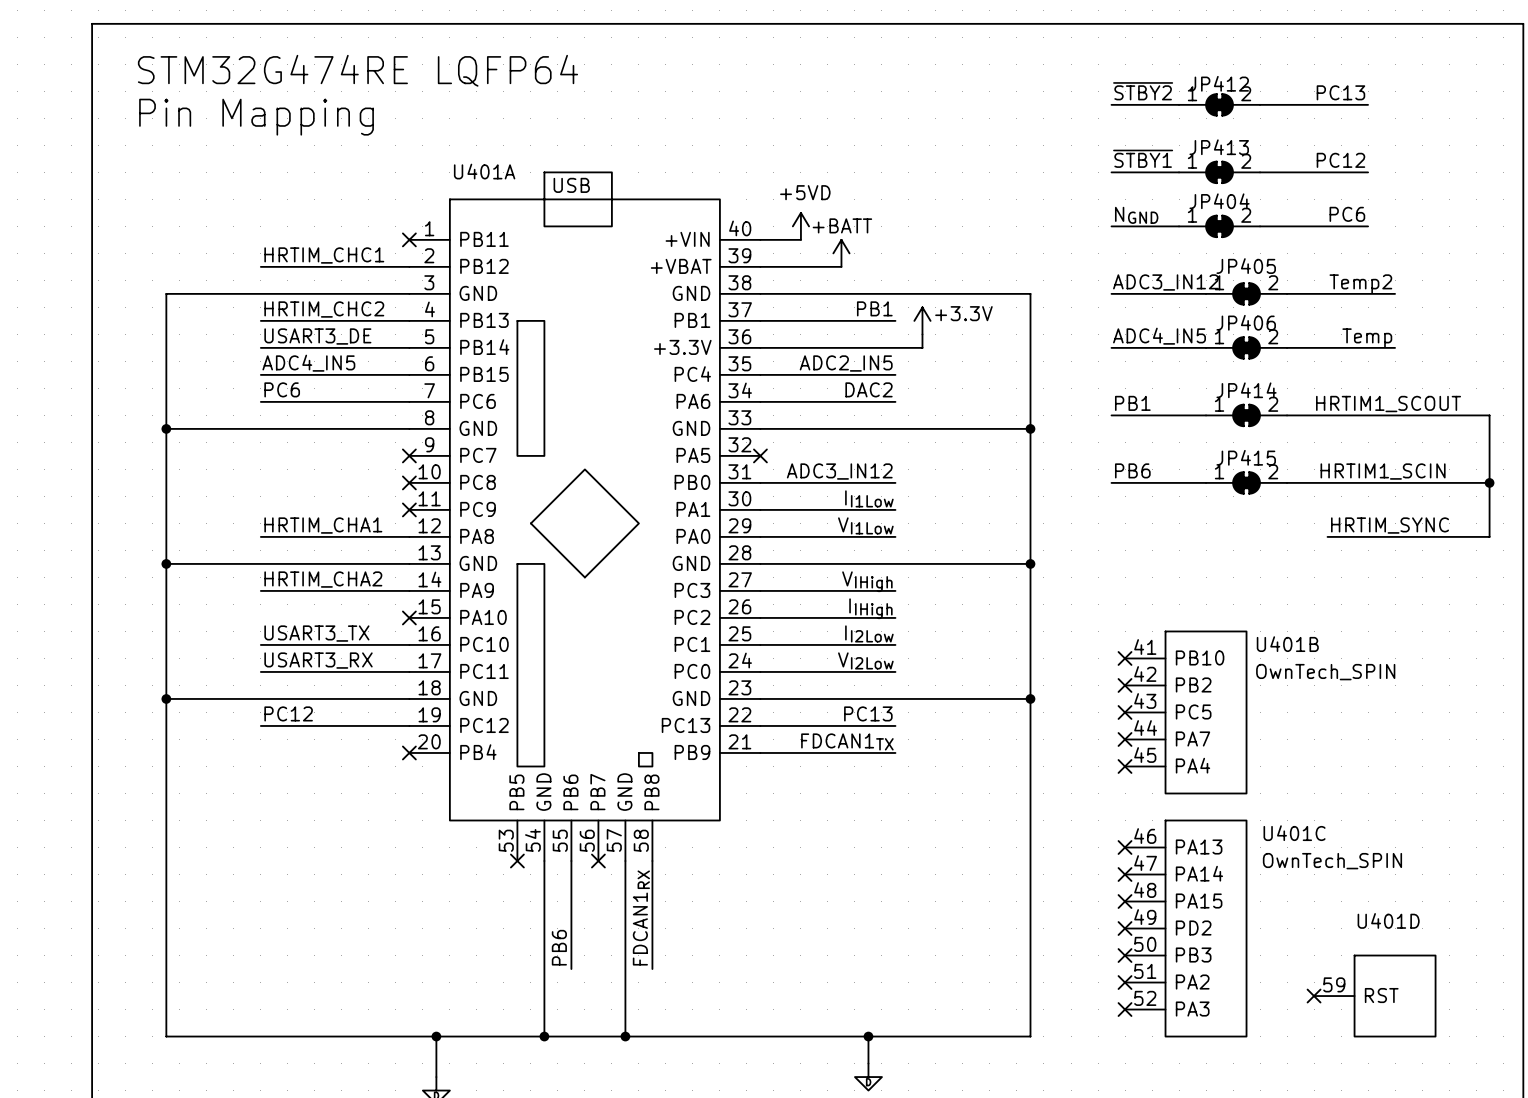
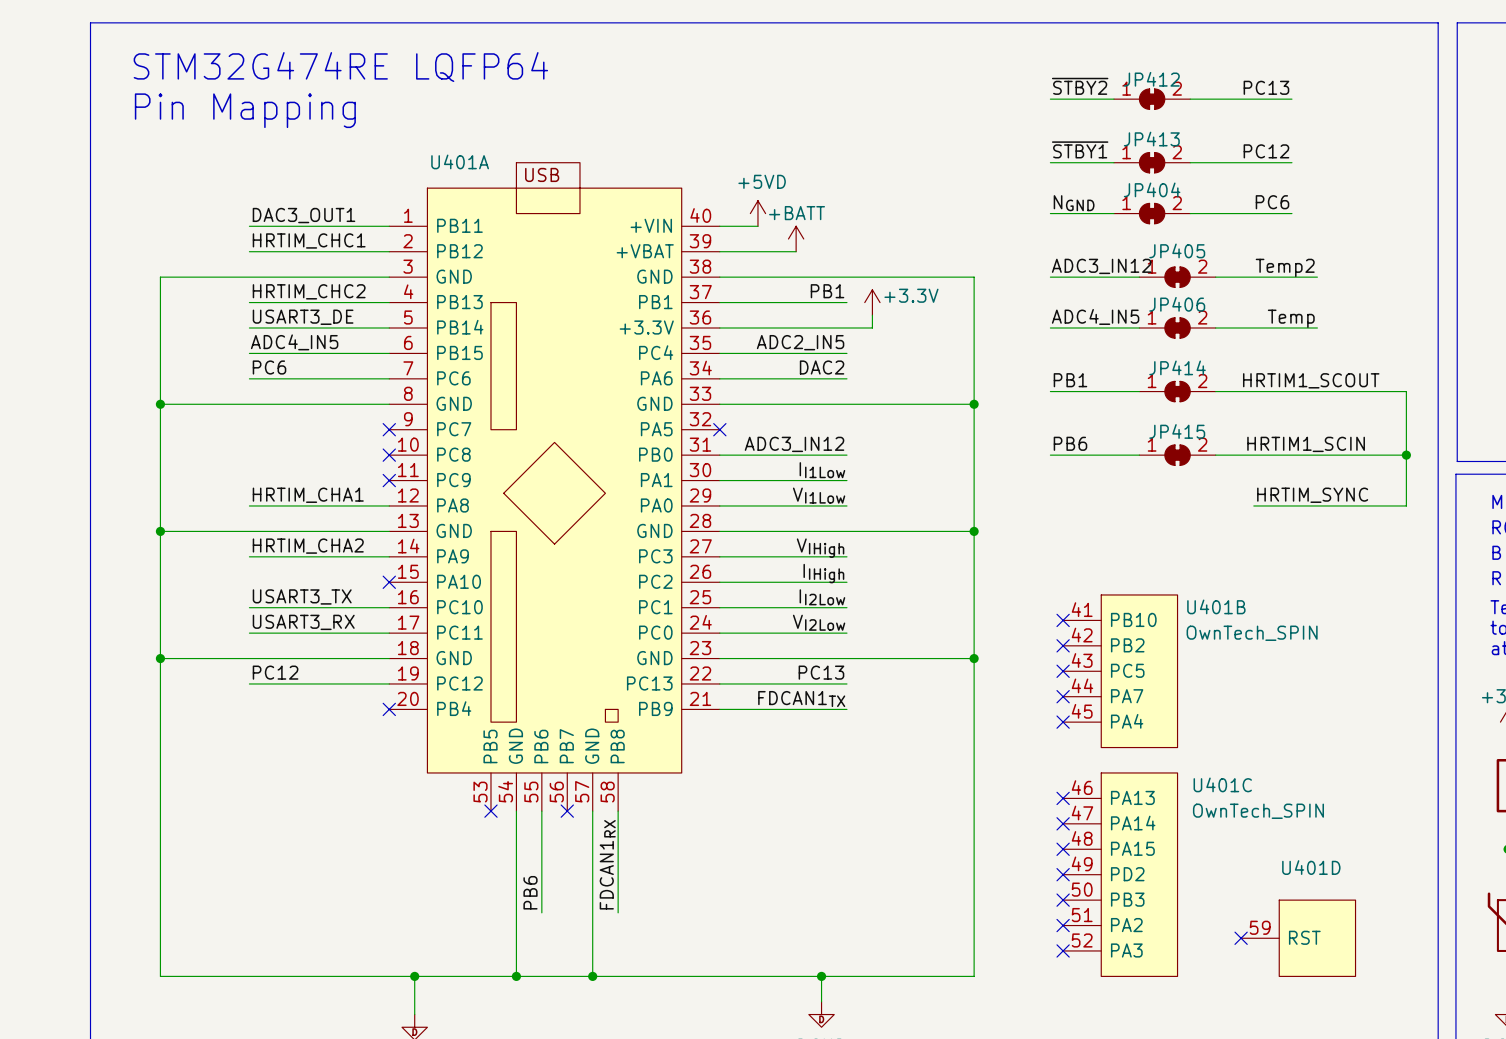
label: none -> DAC3_OUT1 (304, 215)
wire: none -> (249, 226) (389, 226)
no-connect mark: (409, 239) -> none

